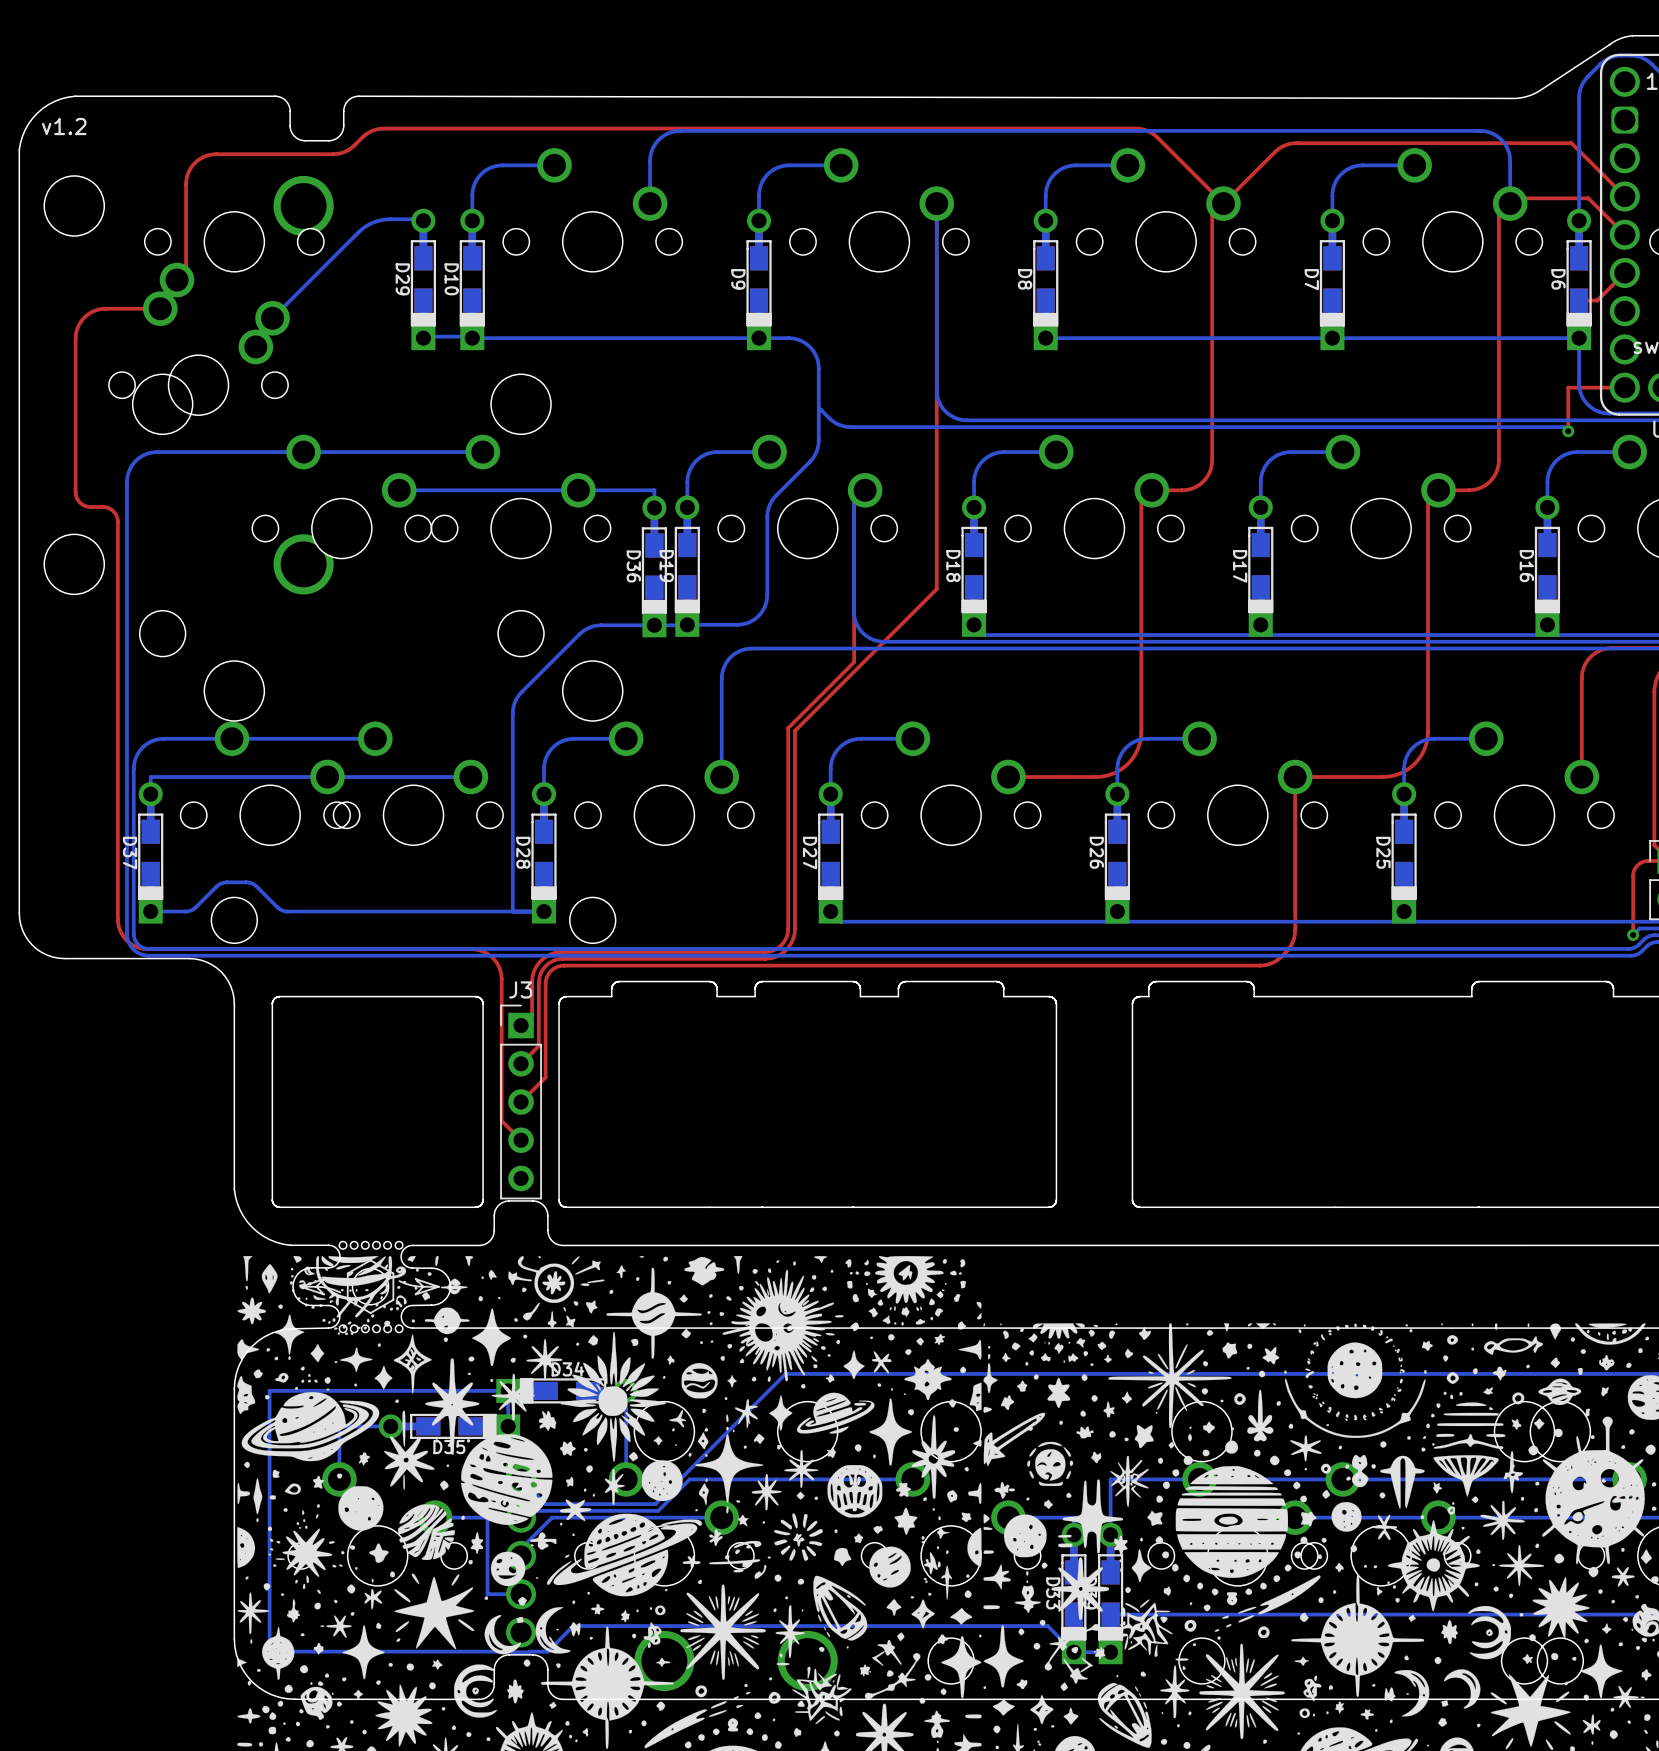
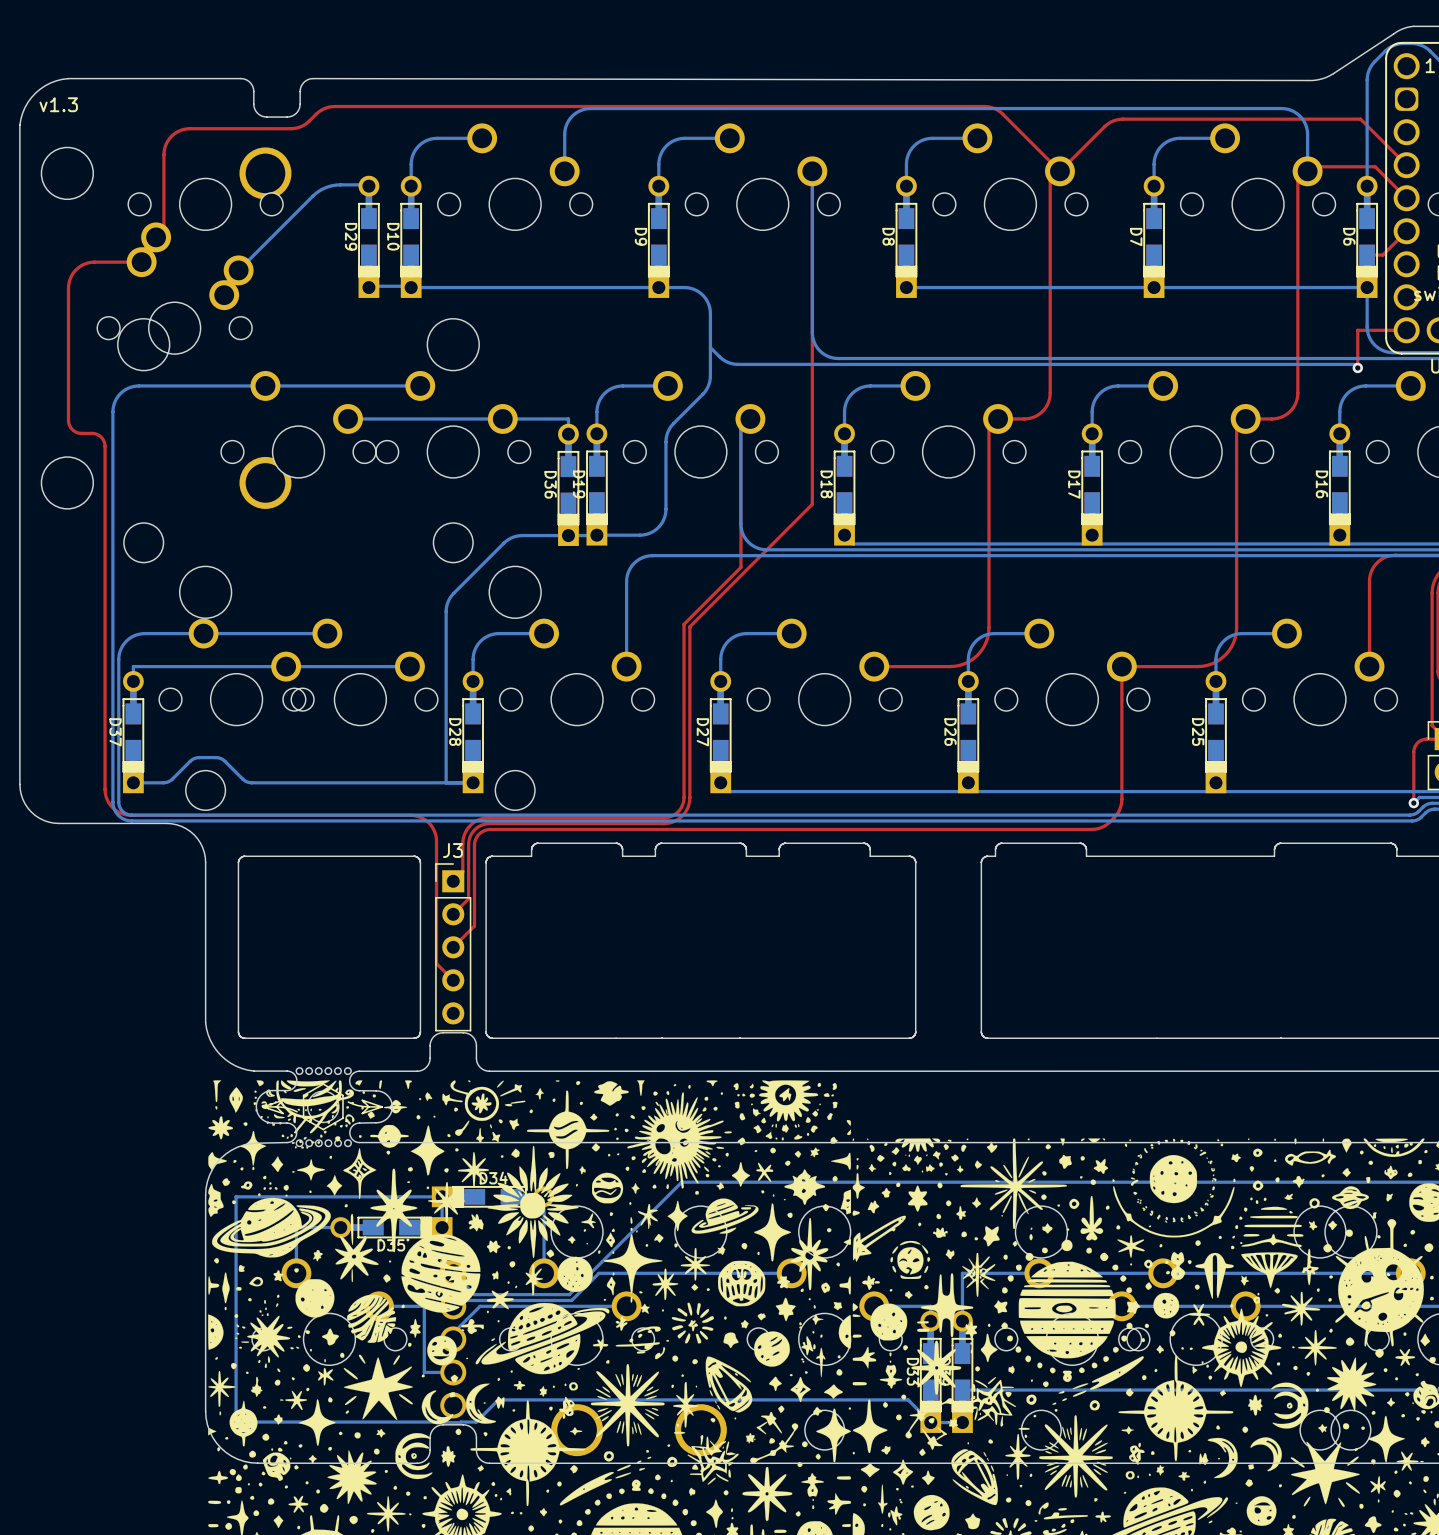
text: v1.2 (64, 126) -> v1.3 (58, 104)

